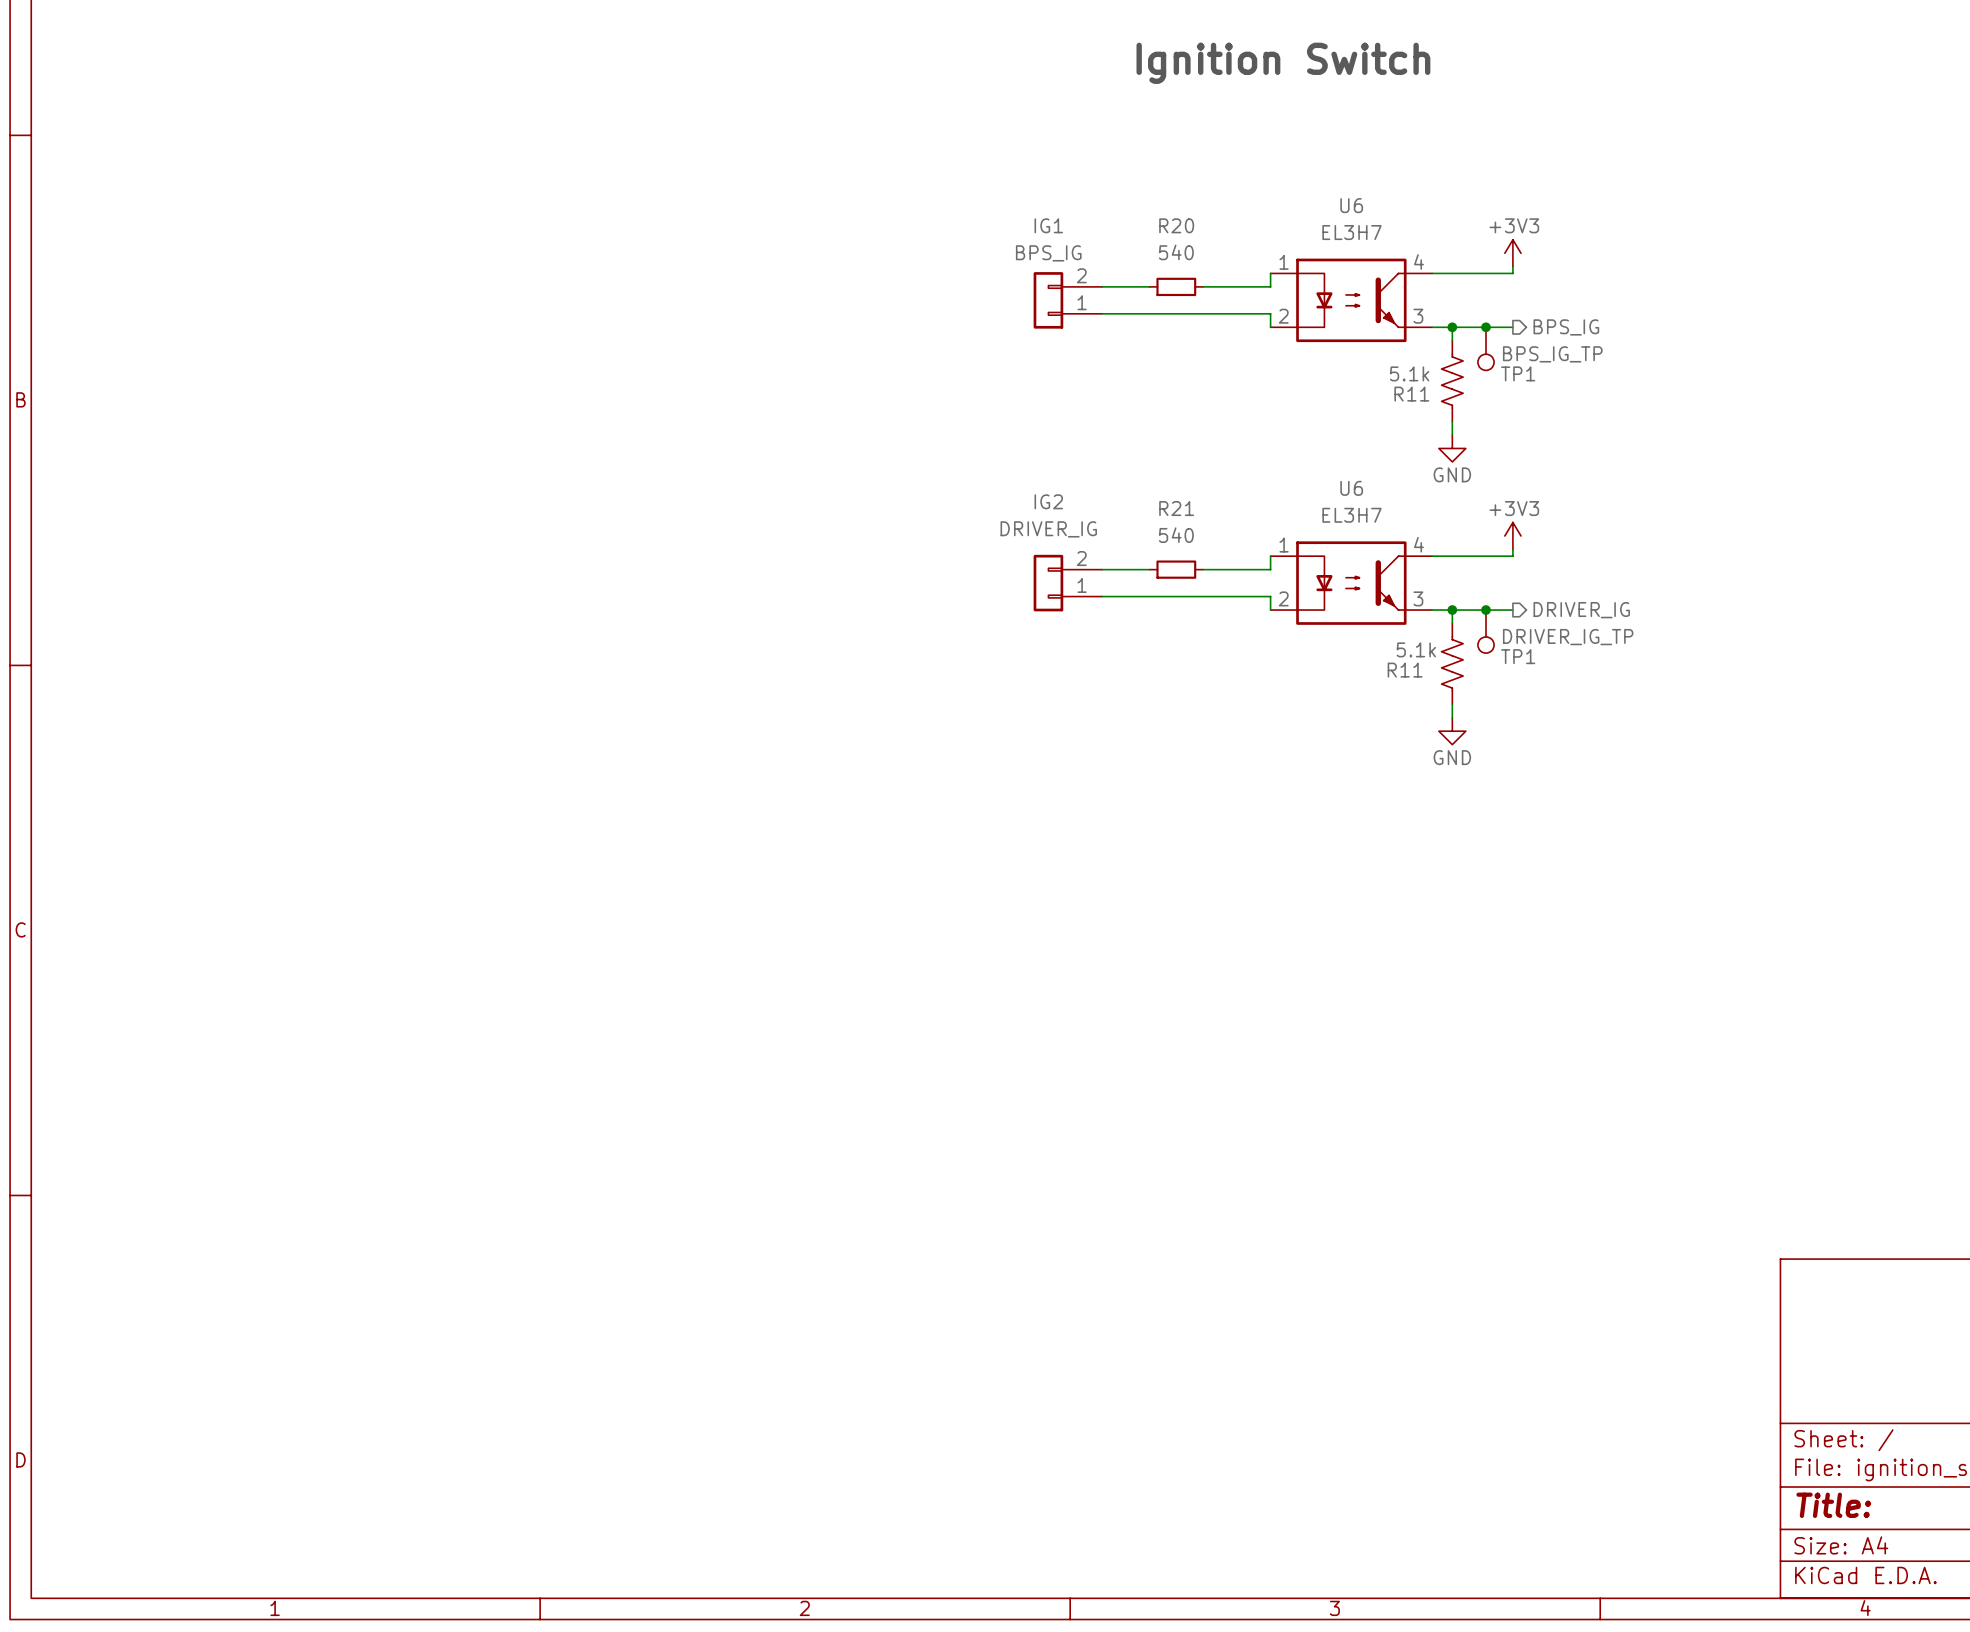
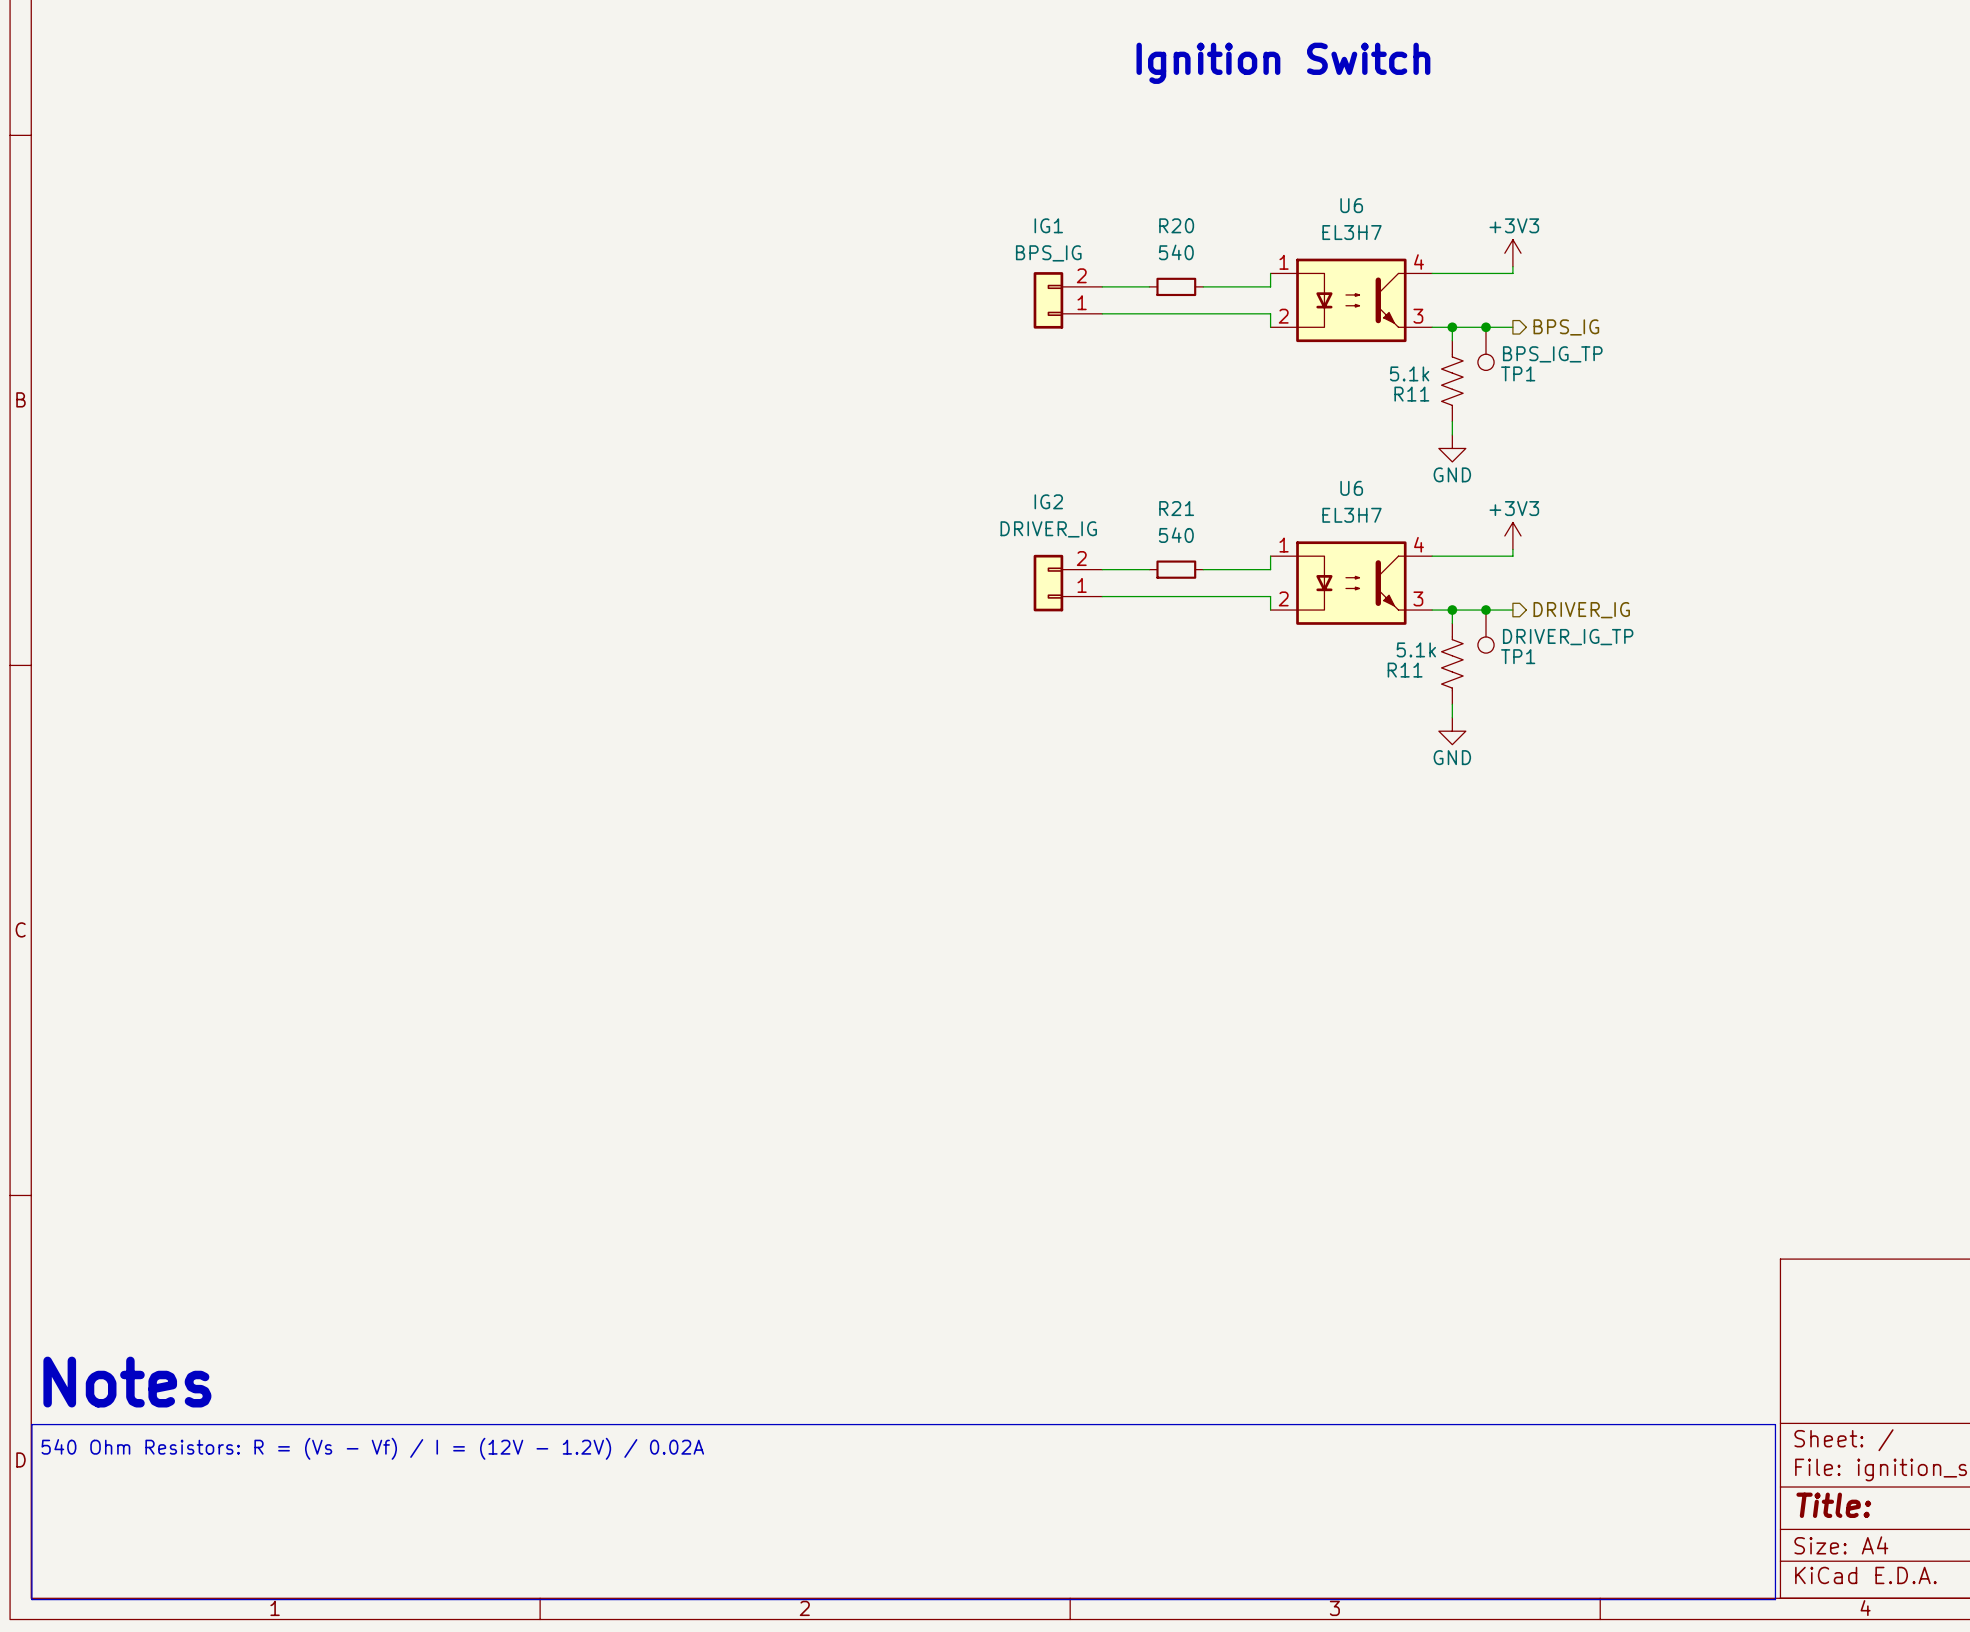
text: none -> Notes (127, 1382)
line: none -> (31, 1424) (1775, 1424) (1775, 1599) (31, 1599) (31, 1424)
text: none -> 540 Ohm Resistors: R = (Vs - Vf) / I = (12V - 1.2V) / 0.02A (372, 1448)

